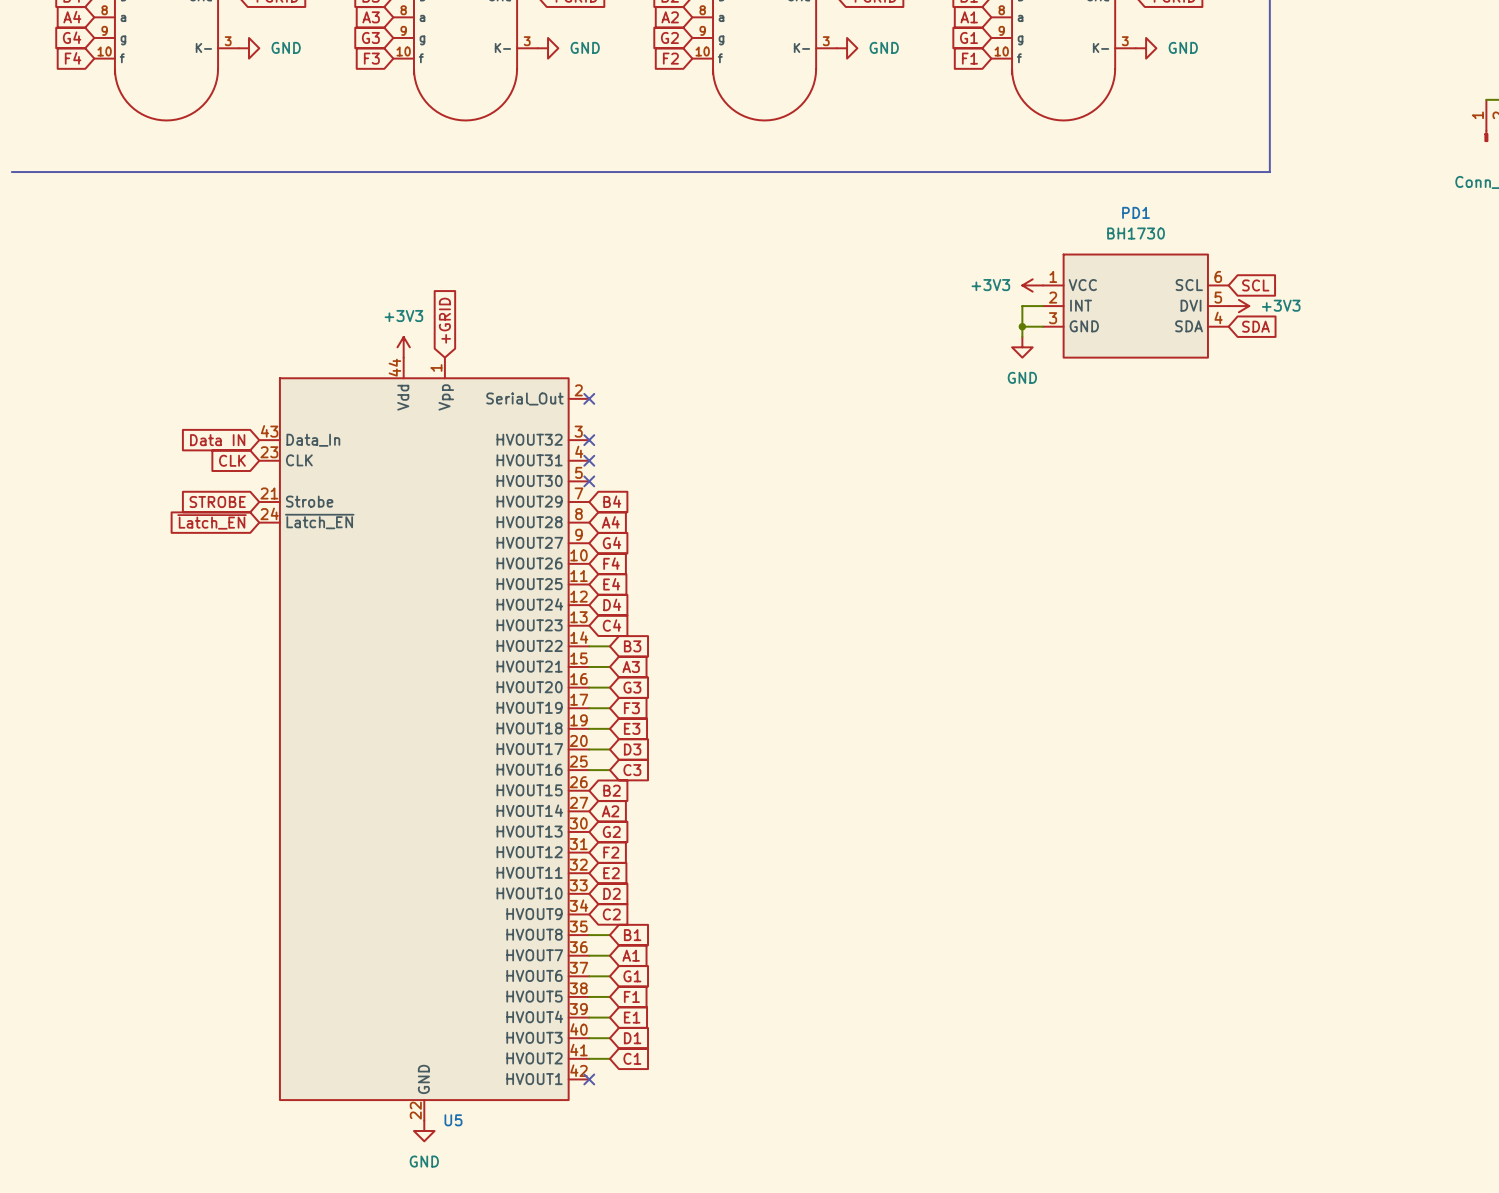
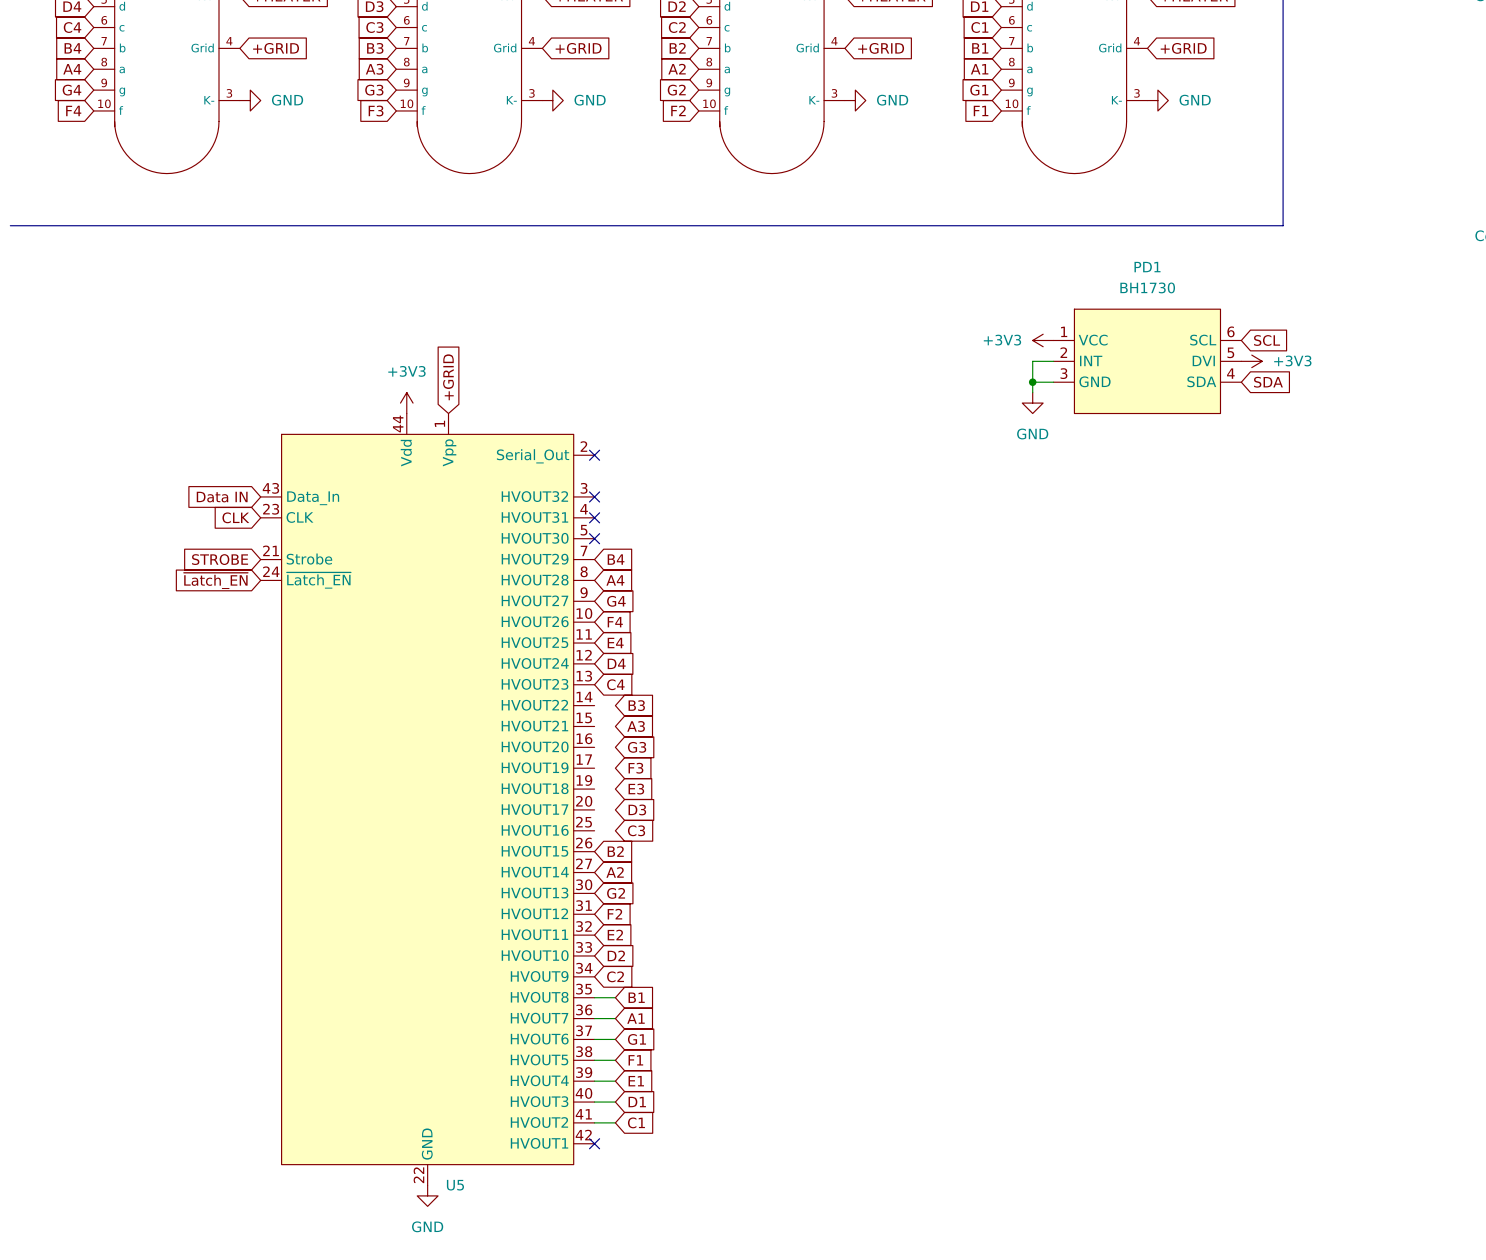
wire: (589, 646) (609, 646) -> none
wire: (589, 666) (609, 666) -> none
wire: (589, 687) (609, 687) -> none
wire: (589, 708) (609, 708) -> none
wire: (589, 728) (609, 728) -> none
wire: (589, 749) (609, 749) -> none
wire: (589, 770) (609, 770) -> none

